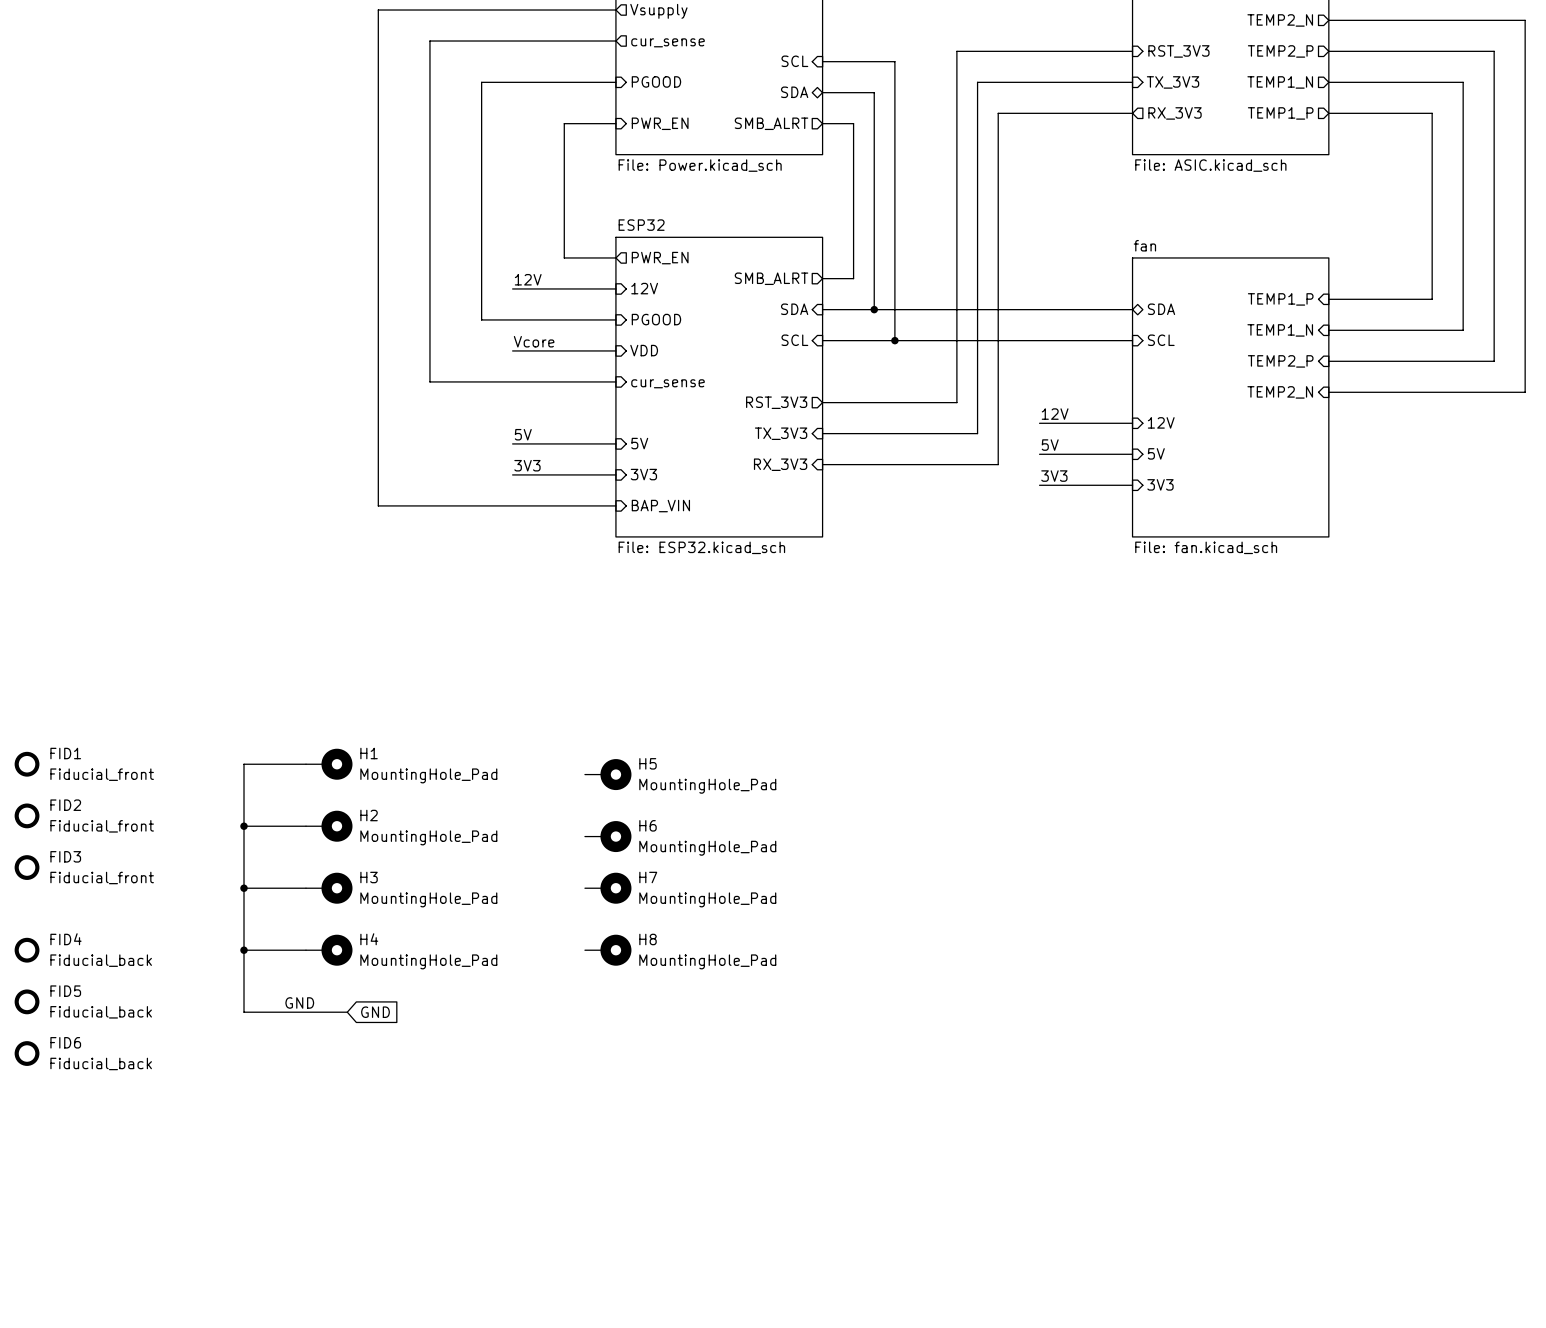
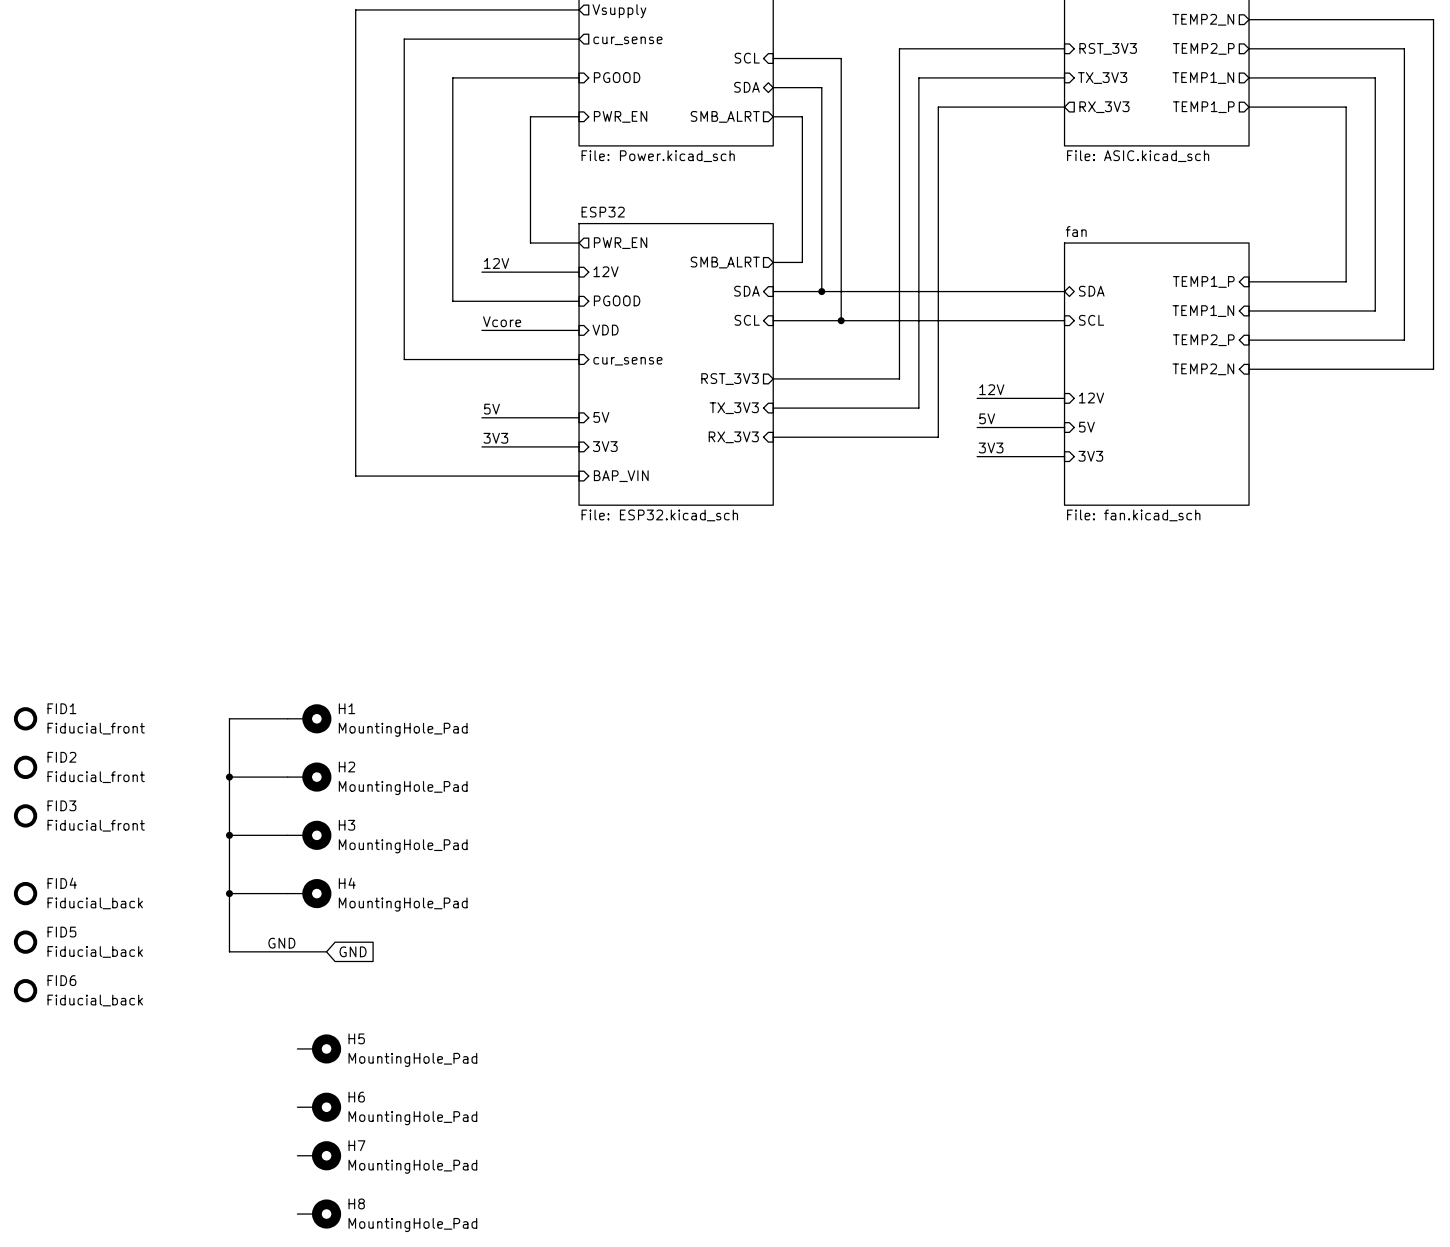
H5 position: (608, 774) -> (319, 1048)
H6 position: (608, 836) -> (319, 1107)
H7 position: (608, 888) -> (319, 1155)
H8 position: (608, 950) -> (319, 1214)

